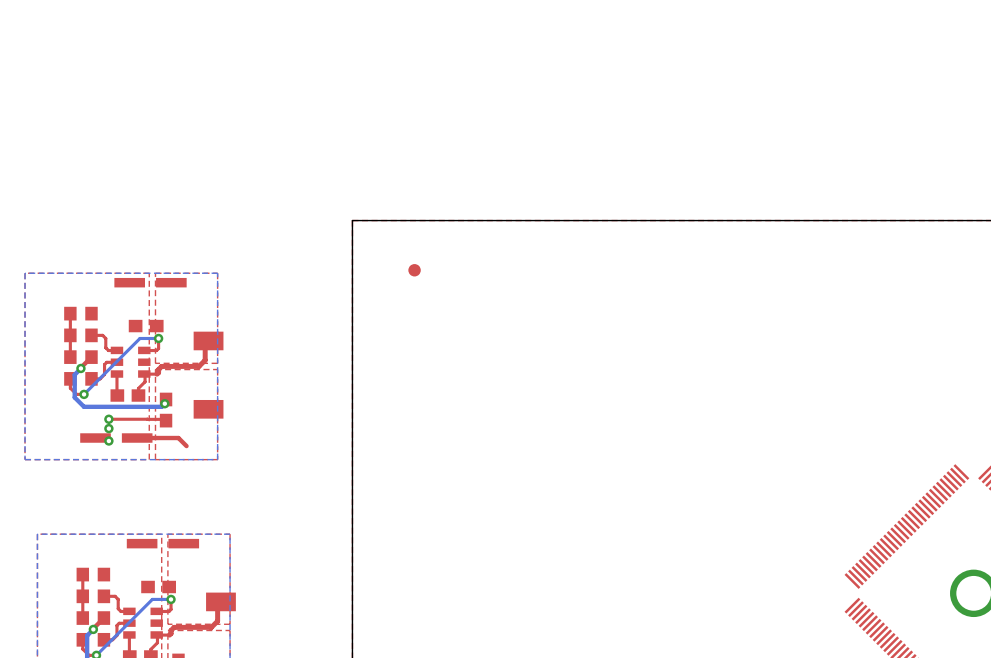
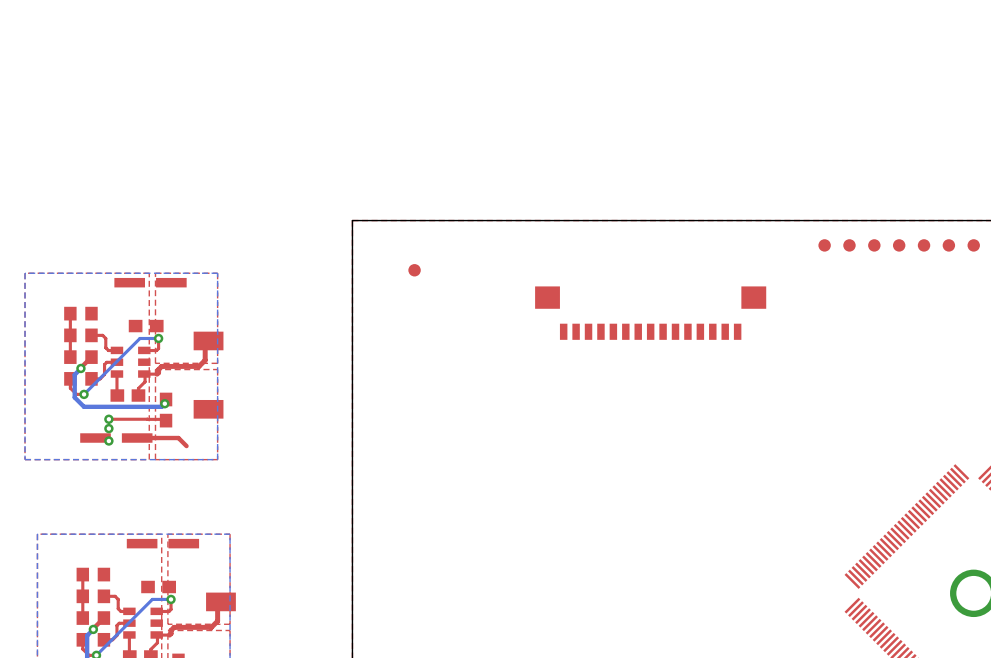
part: none -> (824, 245)
part: none -> (849, 245)
part: none -> (874, 245)
part: none -> (899, 245)
part: none -> (924, 245)
part: none -> (948, 245)
part: none -> (973, 245)
part: none -> (650, 313)

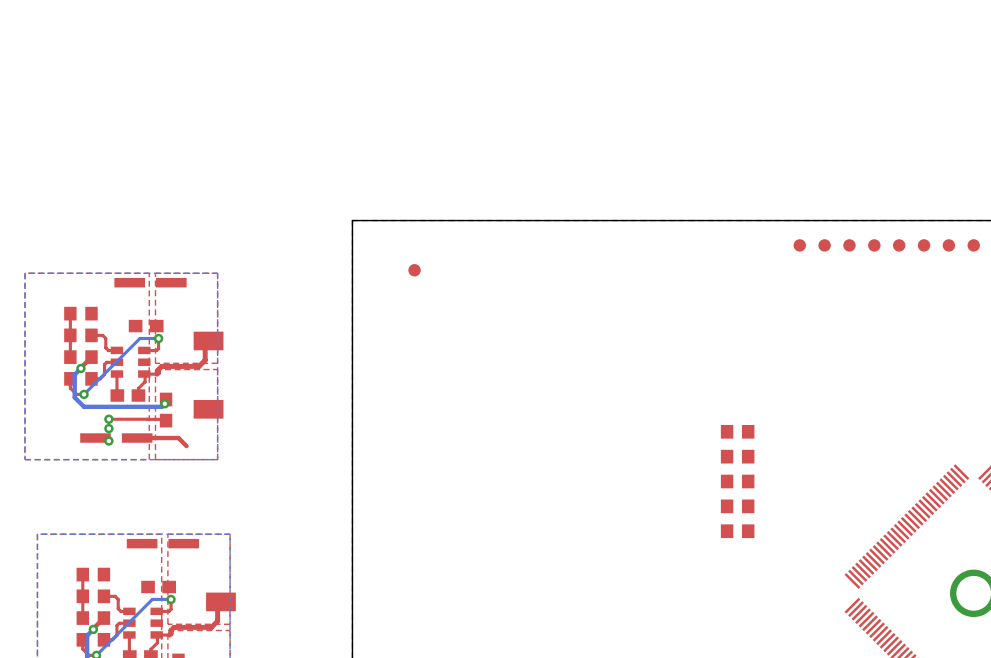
part: none -> (799, 245)
part: (650, 313) -> none
part: none -> (737, 431)
part: none -> (737, 456)
part: none -> (737, 481)
part: none -> (737, 506)
part: none -> (737, 531)

